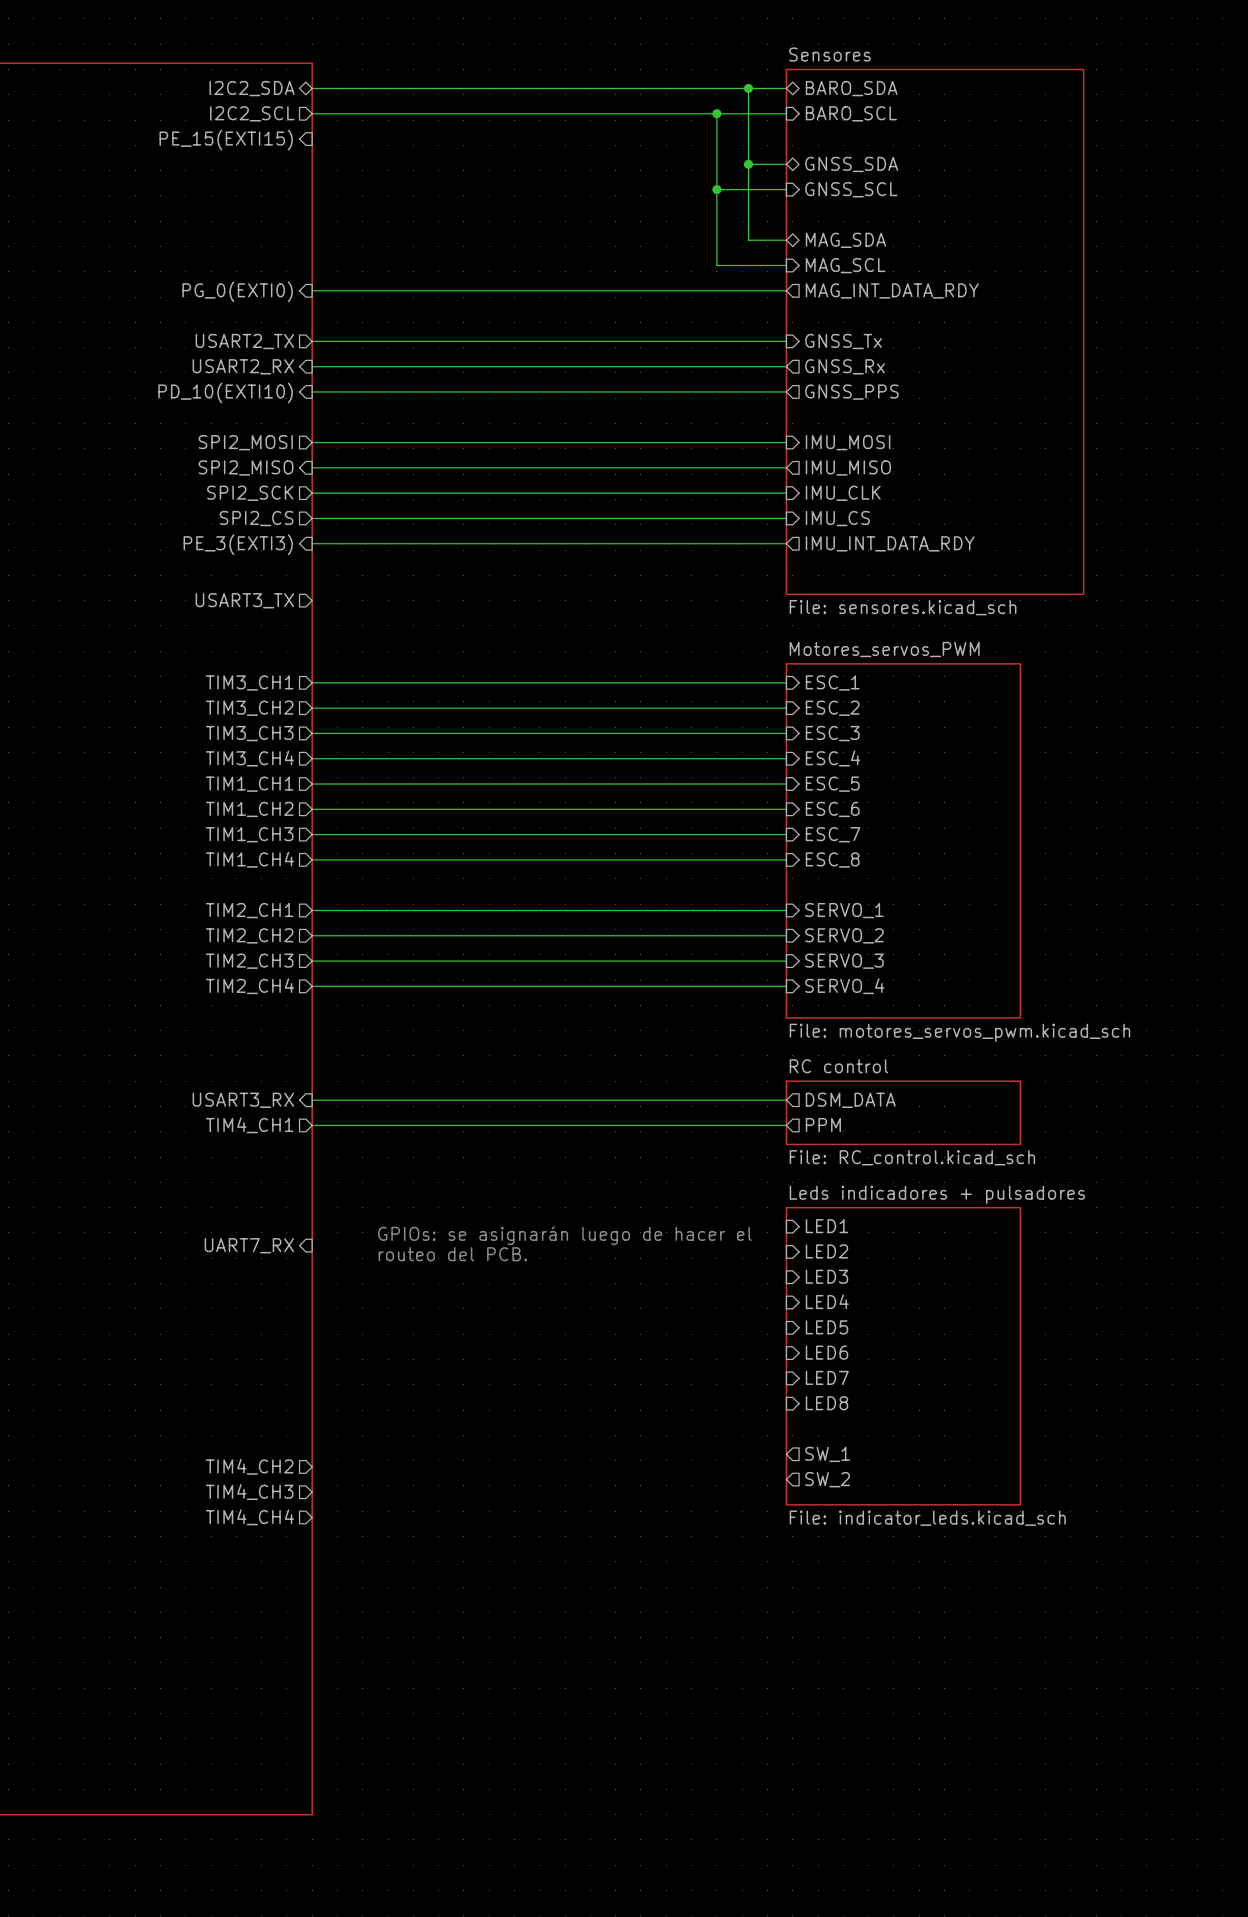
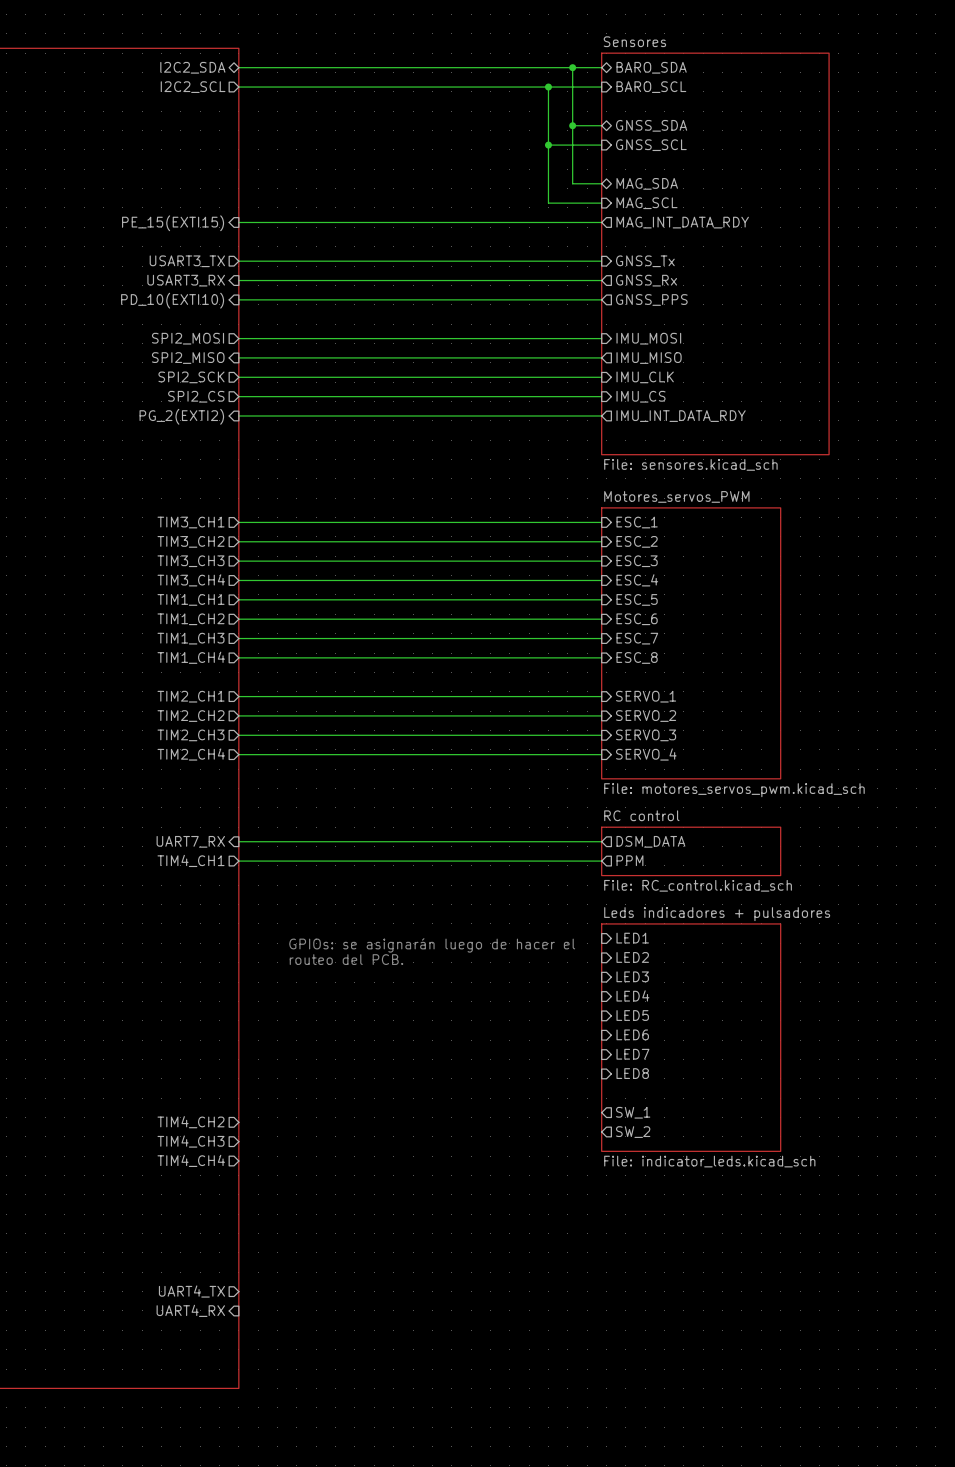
sheet pin: PE_15(EXTI15) (226, 140) -> none
sheet pin: PG_0(EXTI0) (237, 291) -> PE_15(EXTI15) (173, 223)
sheet pin: USART2_TX (244, 341) -> USART3_TX (187, 261)
sheet pin: USART2_RX (243, 366) -> USART3_RX (186, 280)
sheet pin: PE_3(EXTI3) (238, 544) -> PG_2(EXTI2) (181, 416)
sheet pin: USART3_TX (244, 600) -> none
sheet pin: USART3_RX (243, 1100) -> UART7_RX (190, 841)
sheet pin: UART7_RX (249, 1245) -> none
sheet pin: none -> UART4_TX (191, 1291)
sheet pin: none -> UART4_RX (190, 1310)

